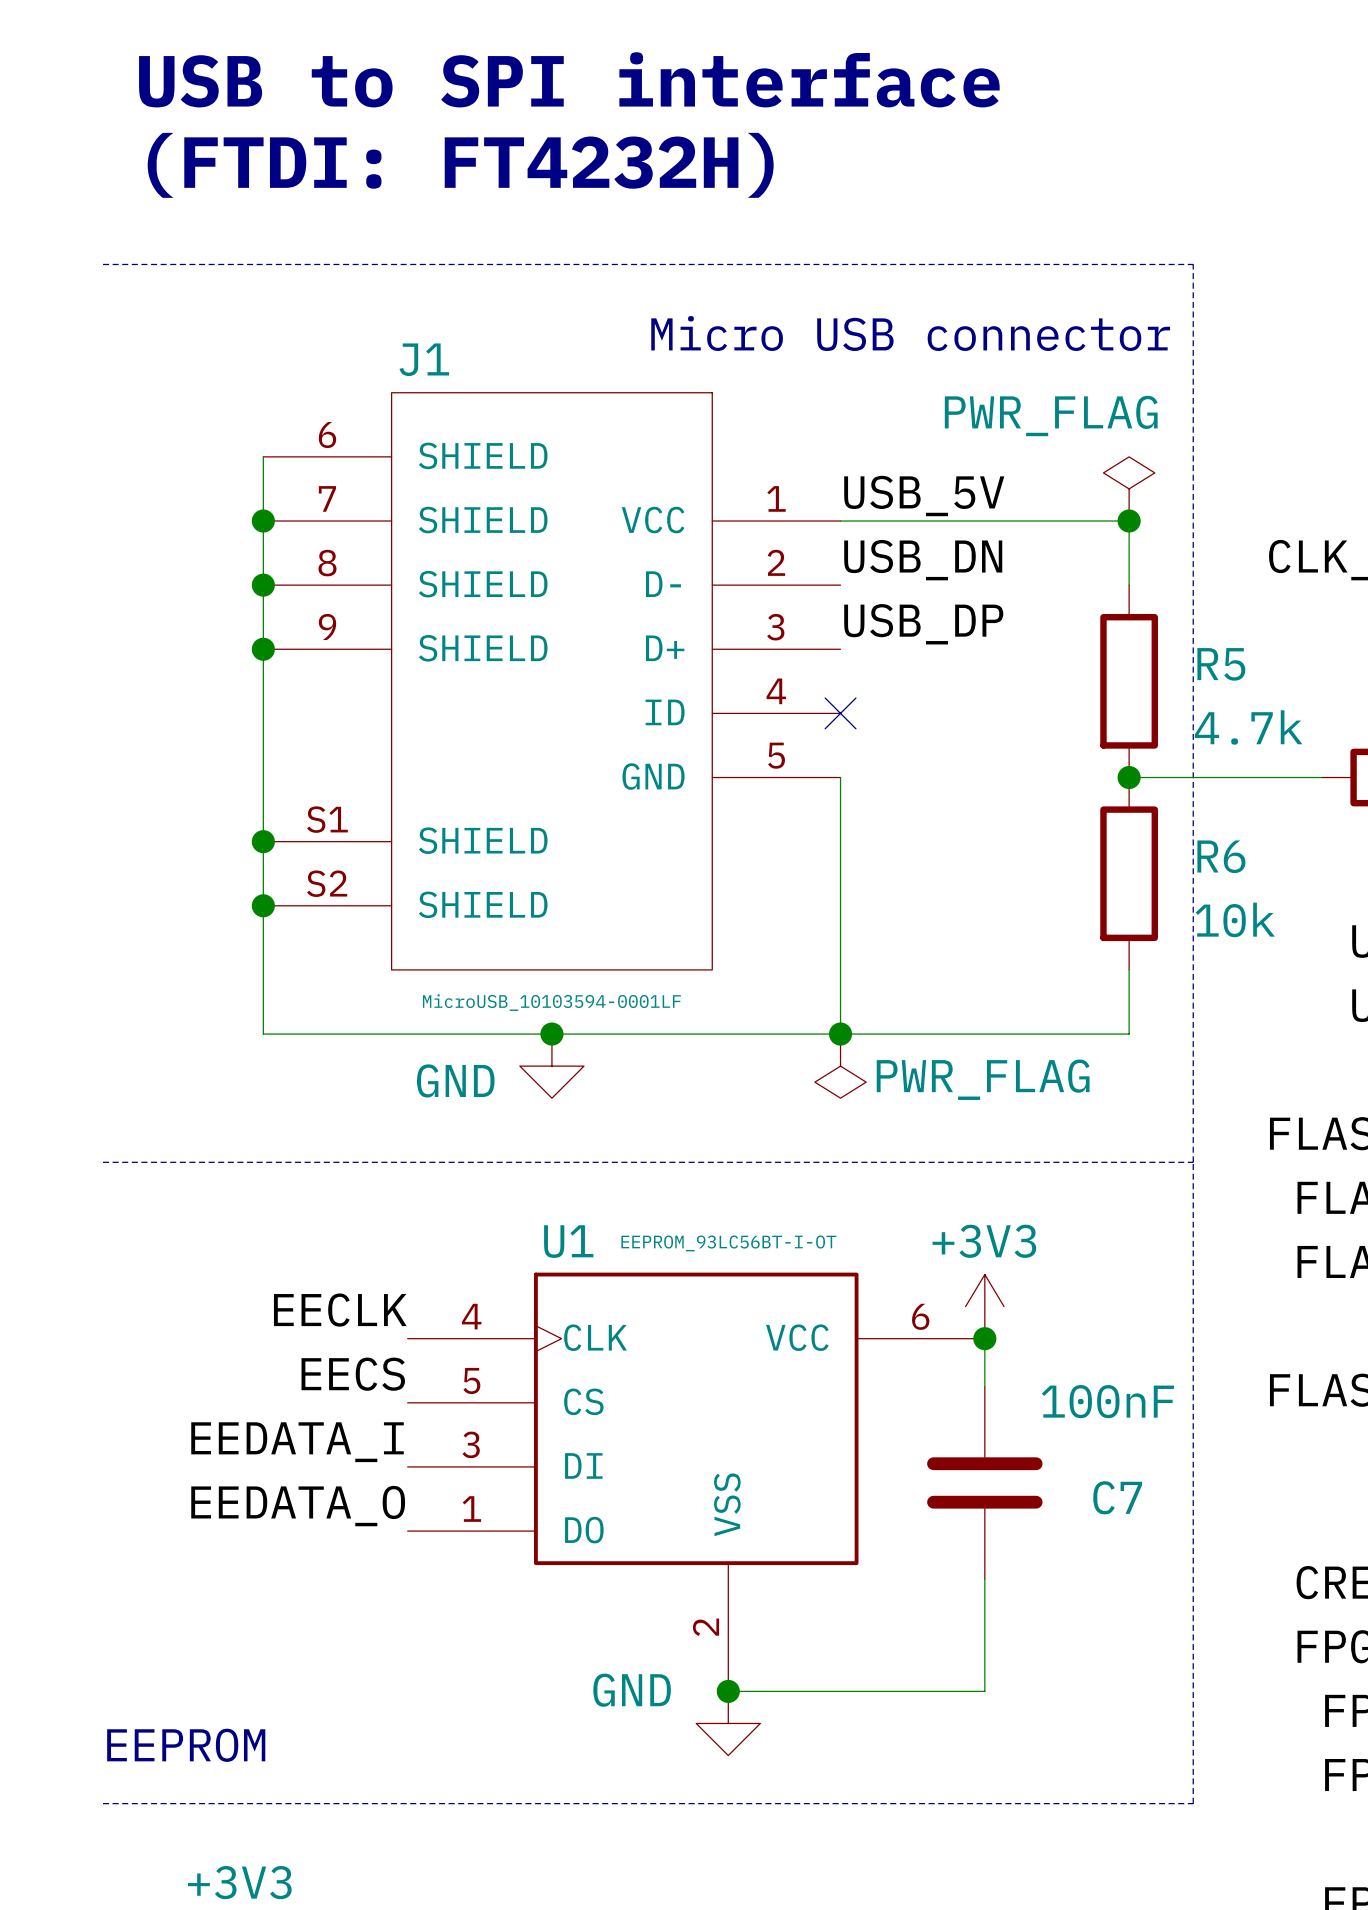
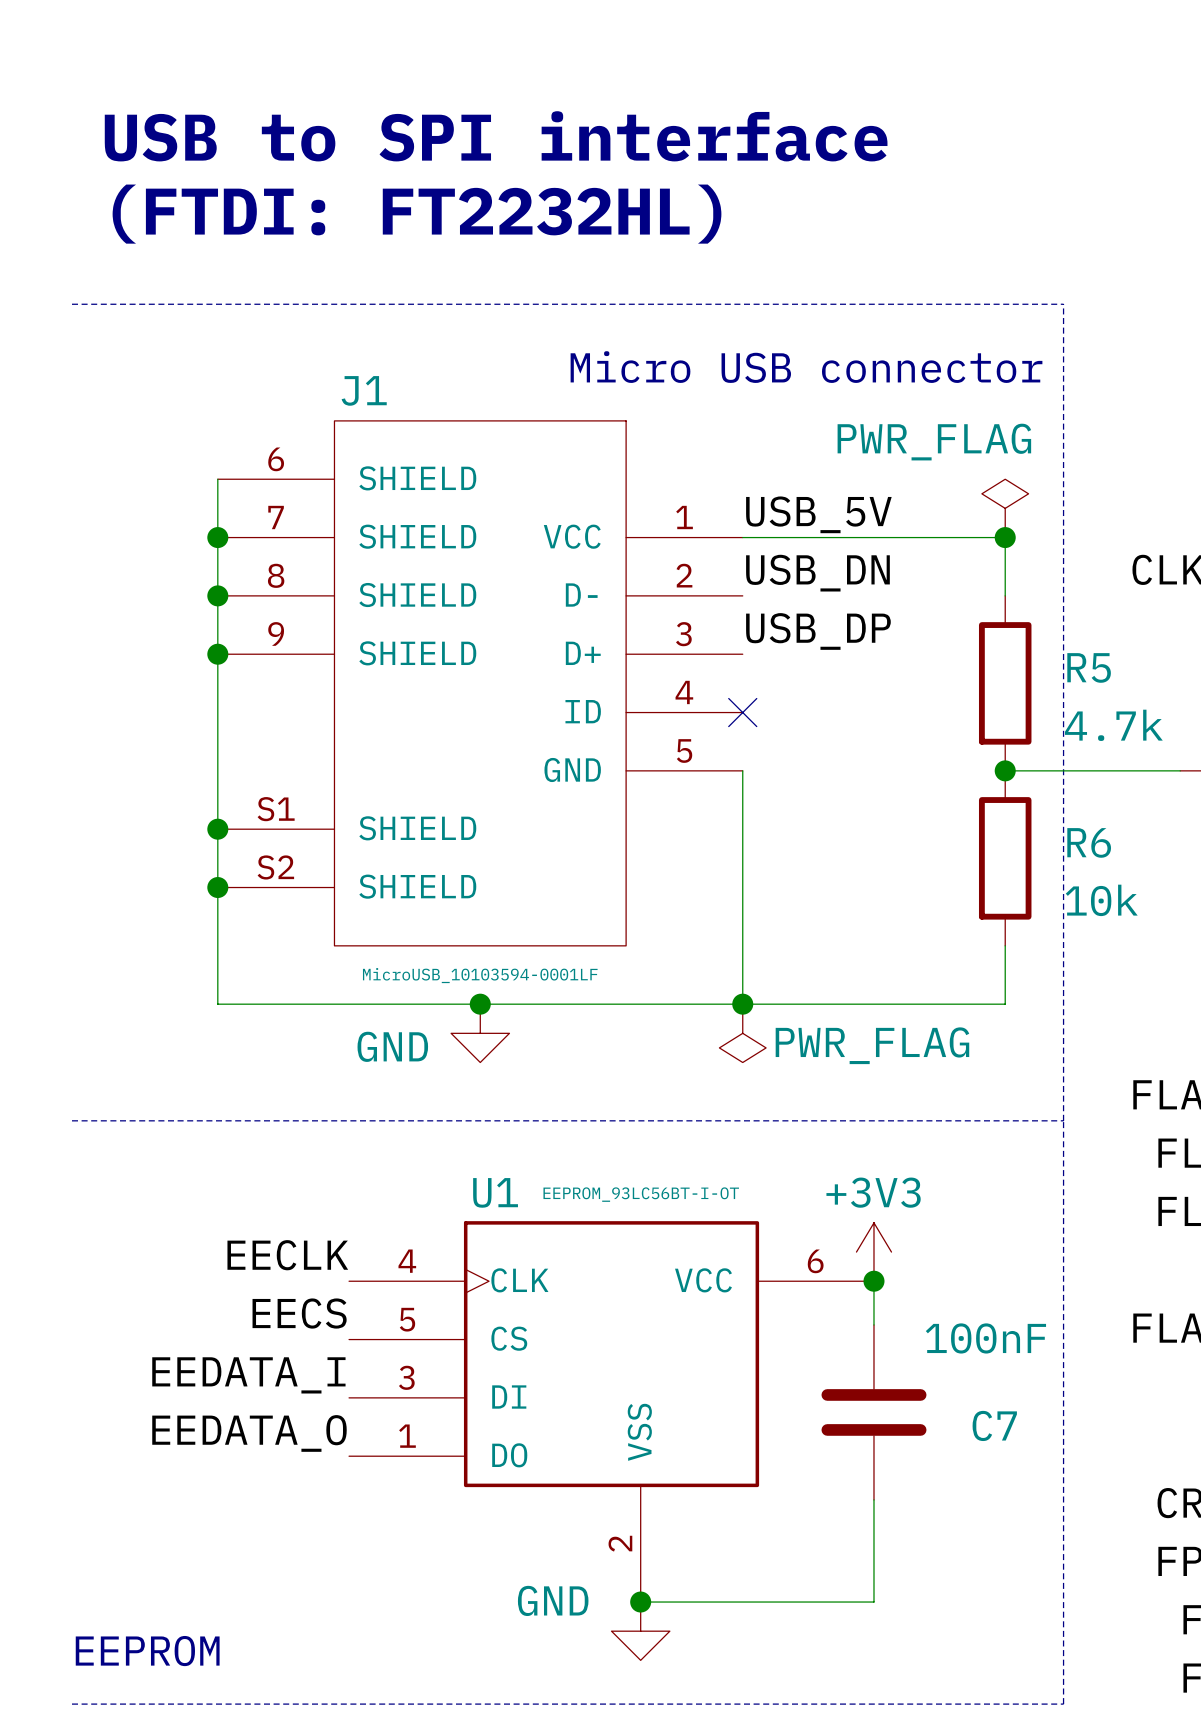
text: (FTDI: FT4232H) (460, 165) -> (FTDI: FT2232HL) (417, 214)

